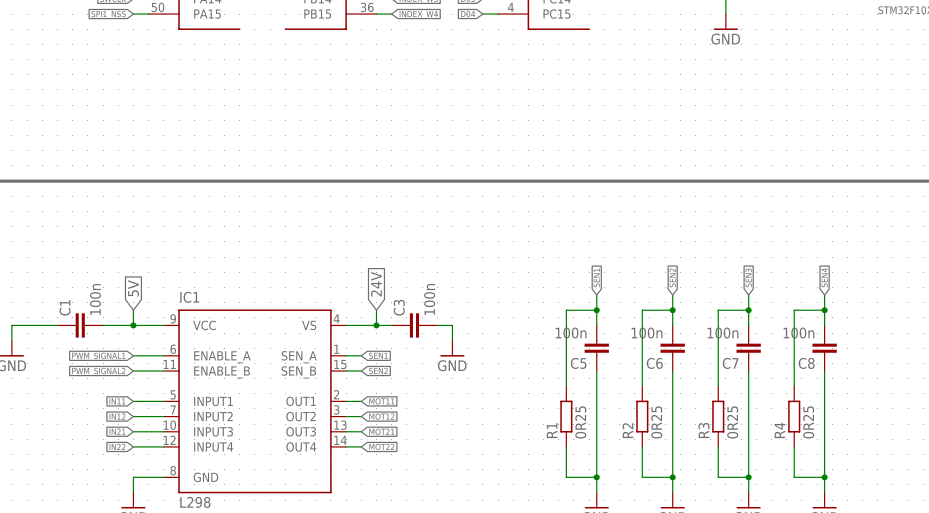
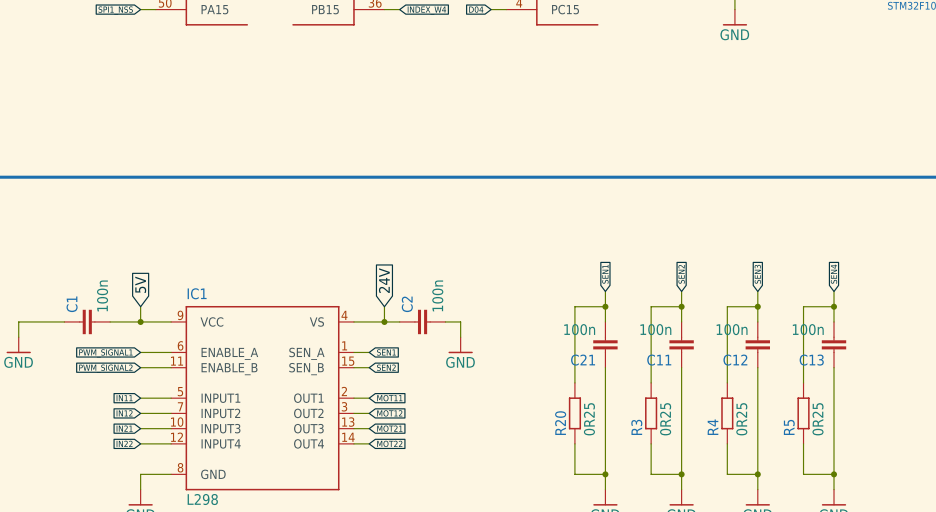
C3 name: C3 (399, 307) -> C2 (407, 304)
C5 name: C5 (578, 363) -> C21 (583, 360)
C6 name: C6 (654, 363) -> C11 (659, 360)
C7 name: C7 (730, 363) -> C12 (735, 360)
C8 name: C8 (806, 363) -> C13 (811, 360)
R1 name: R1 (552, 430) -> R20 (560, 423)
R2 name: R2 (627, 430) -> R3 (636, 427)
R3 name: R3 (704, 430) -> R4 (713, 427)
R4 name: R4 (779, 430) -> R5 (789, 427)

